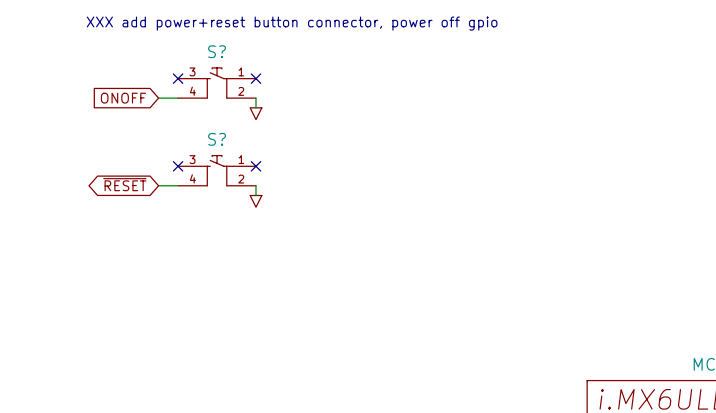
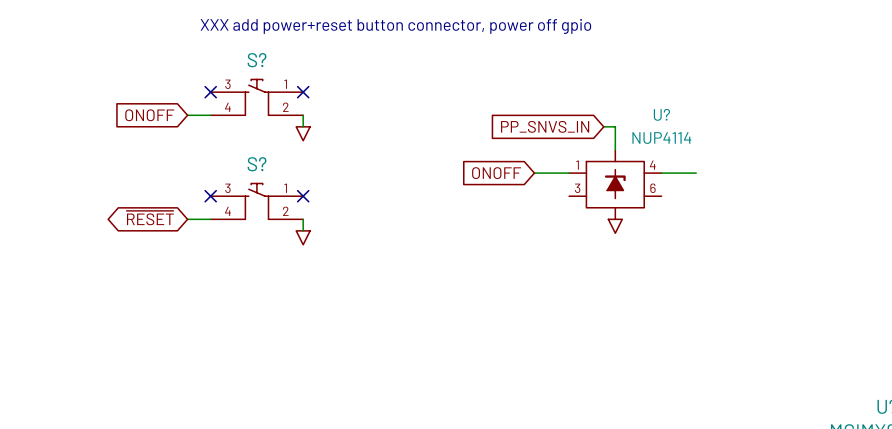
wire: none -> (603, 126) (615, 126) (615, 149)
global label: none -> PP_SNVS_IN (545, 126)
global label: none -> ONOFF (496, 173)
wire: none -> (534, 173) (569, 173)
wire: none -> (661, 173) (696, 173)
U?: none -> NUP4114 (615, 184)
power symbol: none -> (615, 226)

